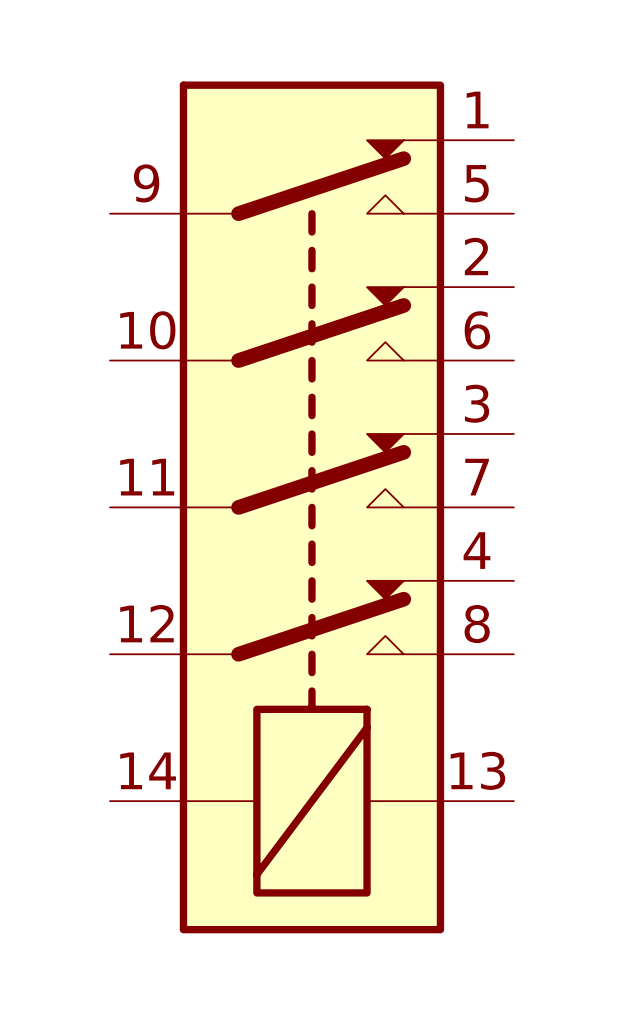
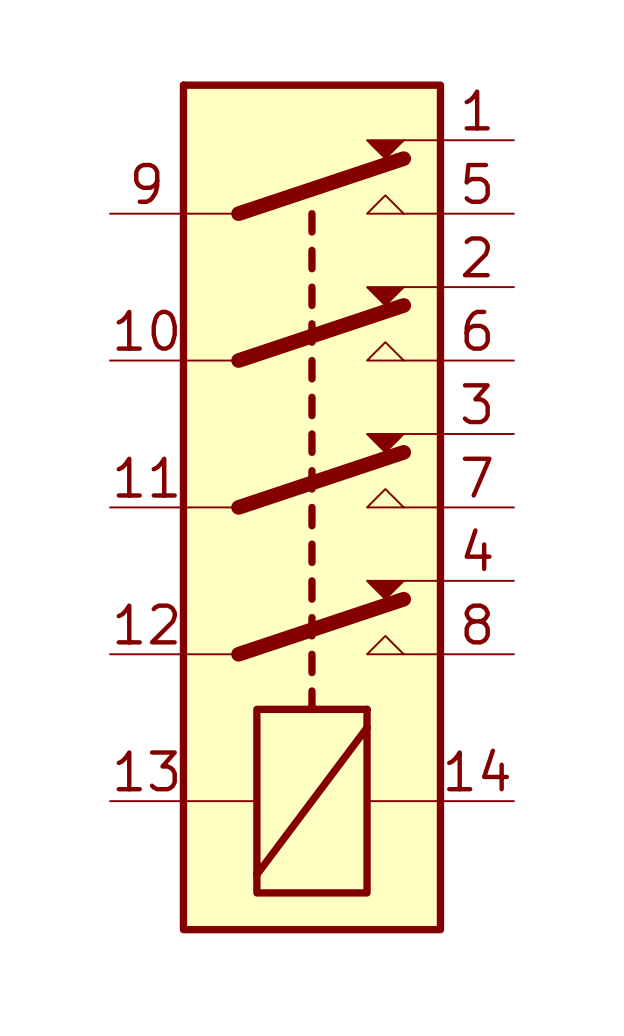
part pin number: 14 (148, 770) -> 13 (146, 770)
part pin number: 13 (477, 770) -> 14 (478, 769)

